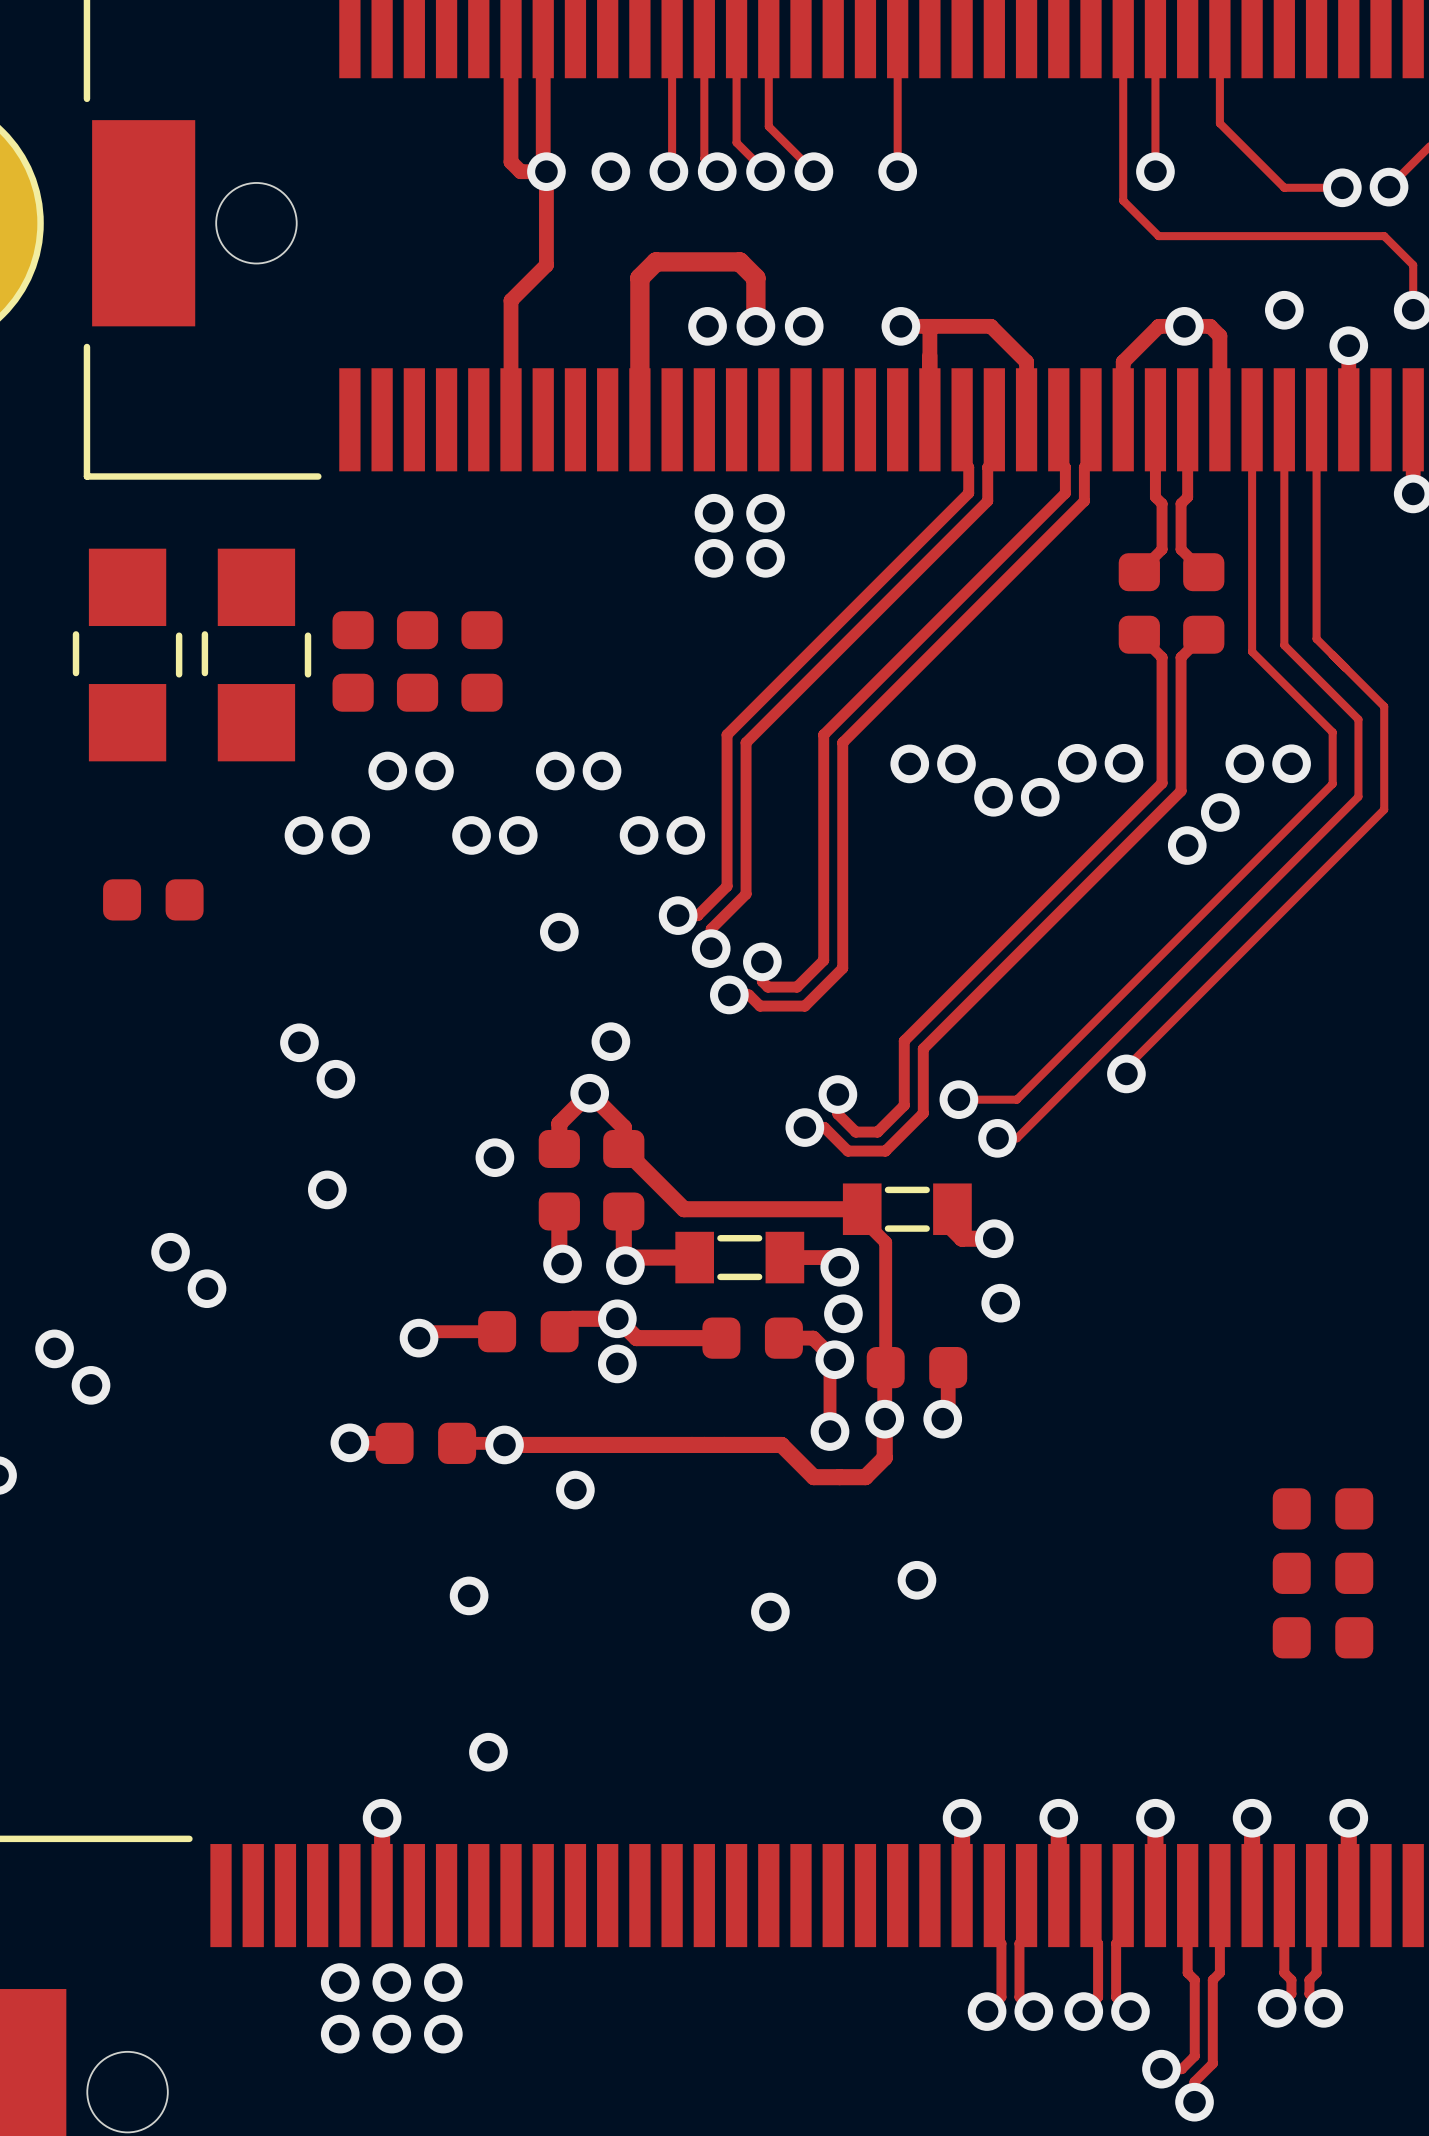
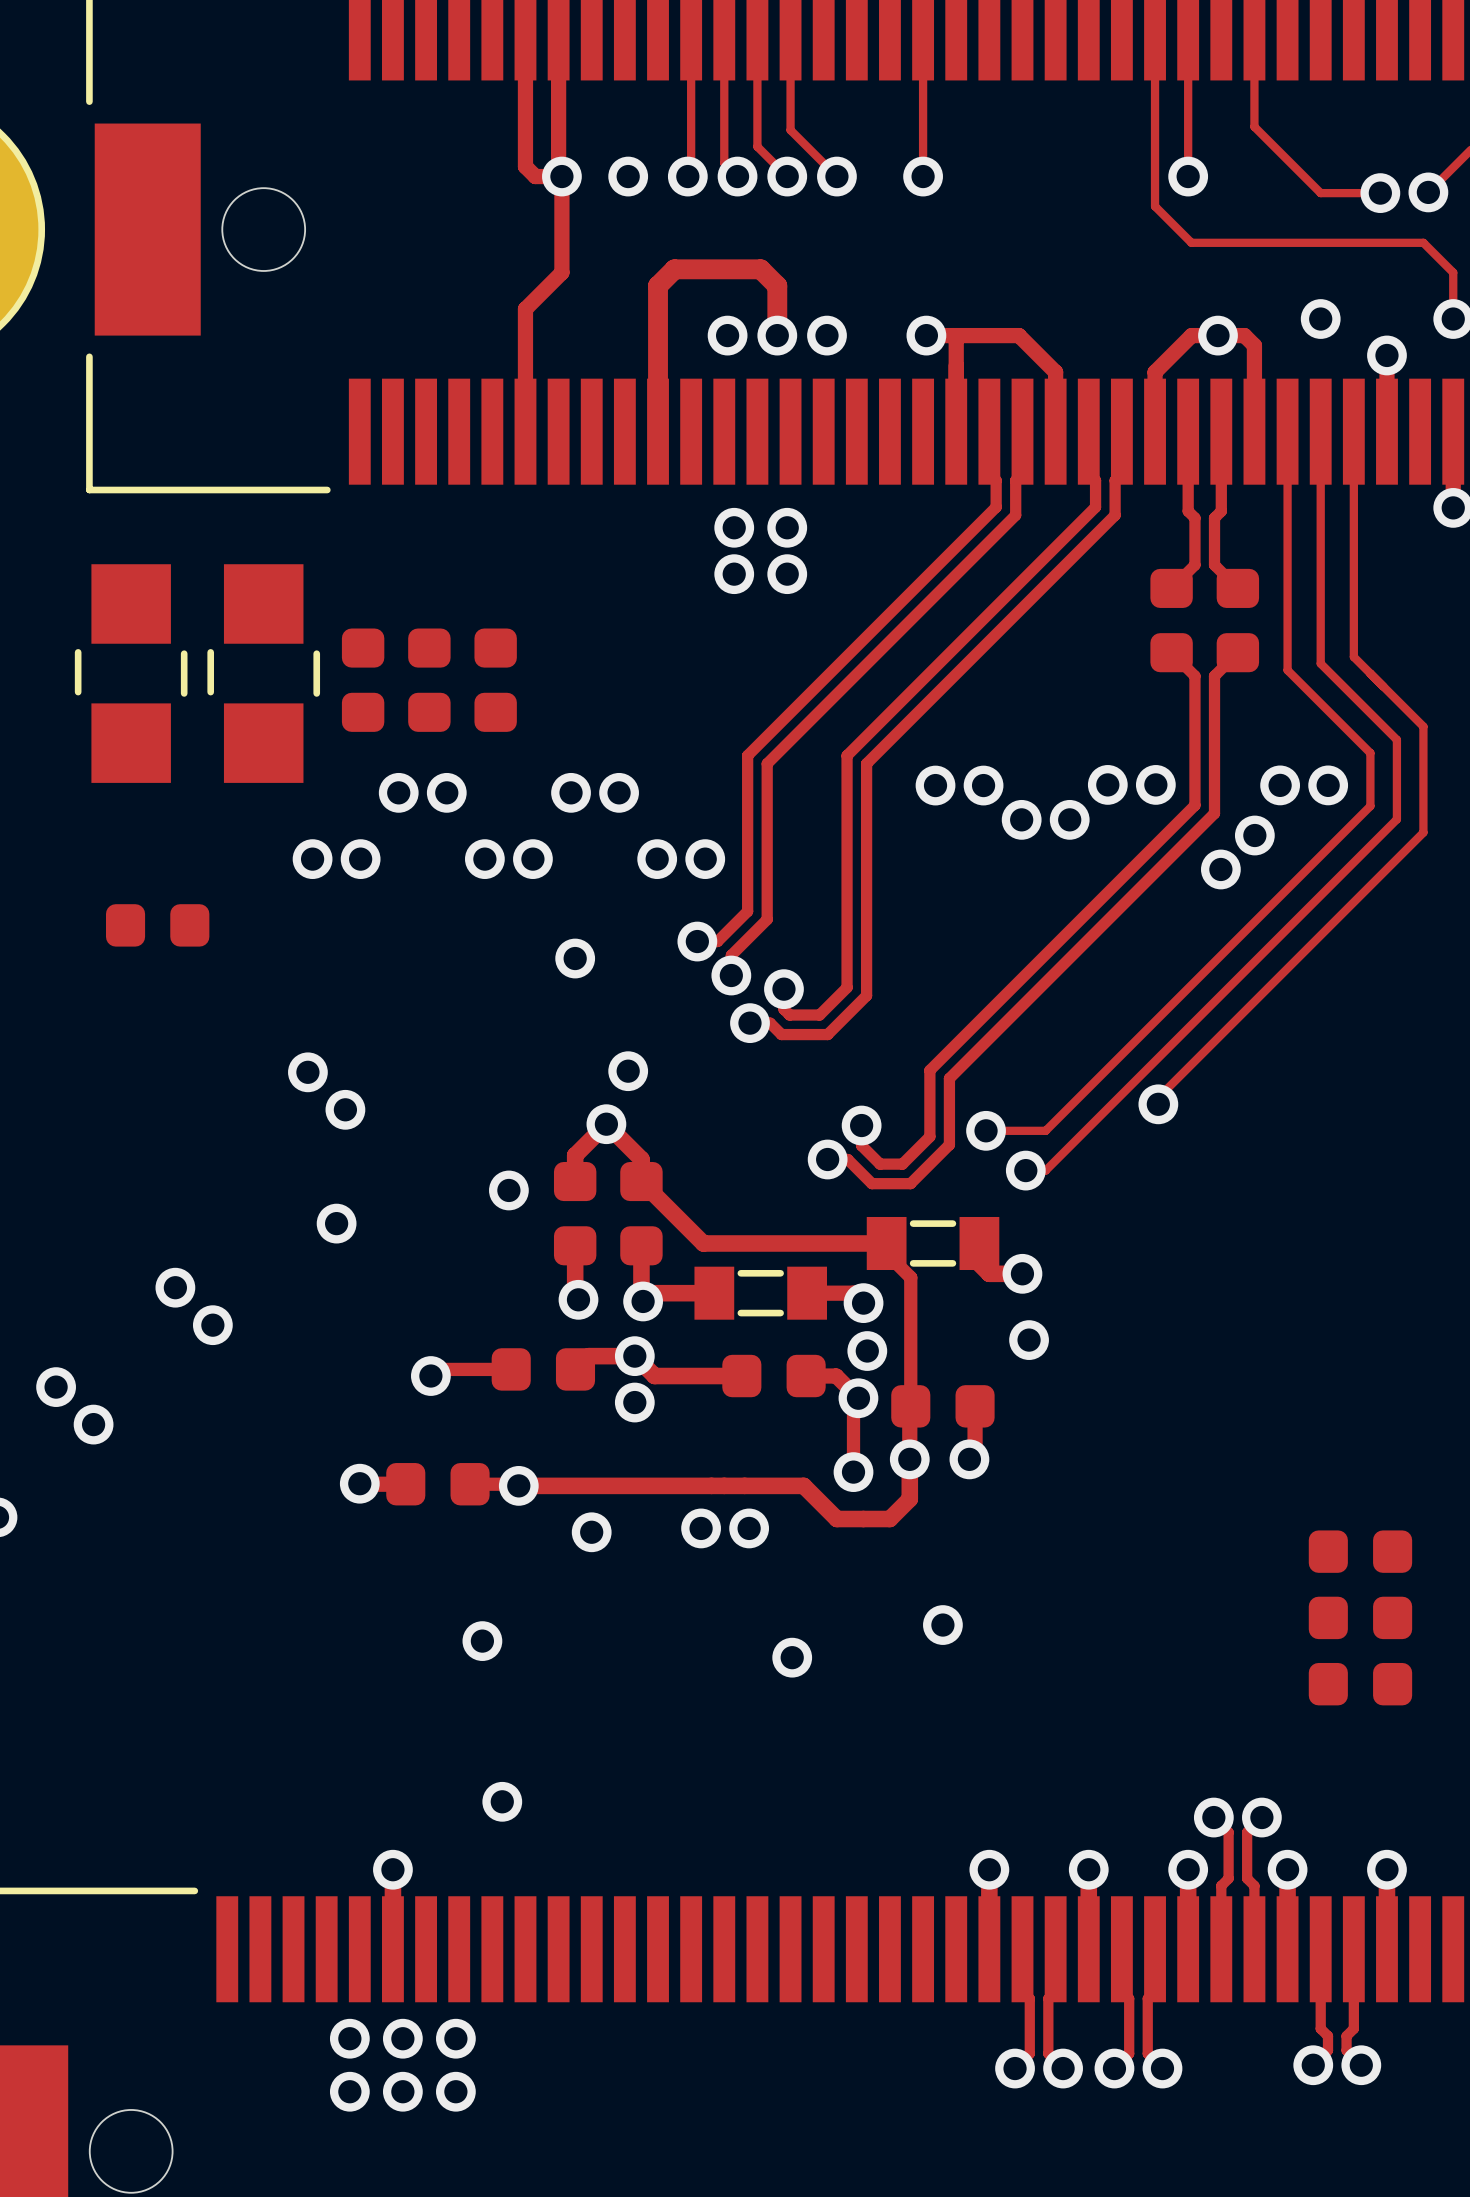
via: none -> (701, 1528)
via: none -> (749, 1528)
via: none -> (1213, 1817)
via: none -> (1261, 1817)
track: (1187, 1895) (1187, 1972) (1194, 1980) (1194, 2056) (1181, 2069) (1161, 2069) -> (1221, 1949) (1221, 1885) (1228, 1878) (1228, 1832) (1213, 1817)
track: (1219, 1895) (1219, 1972) (1212, 1980) (1212, 2063) (1194, 2081) (1194, 2102) -> (1254, 1949) (1254, 1885) (1247, 1878) (1247, 1832) (1261, 1817)
via: (1161, 2069) -> none
via: (1194, 2102) -> none

